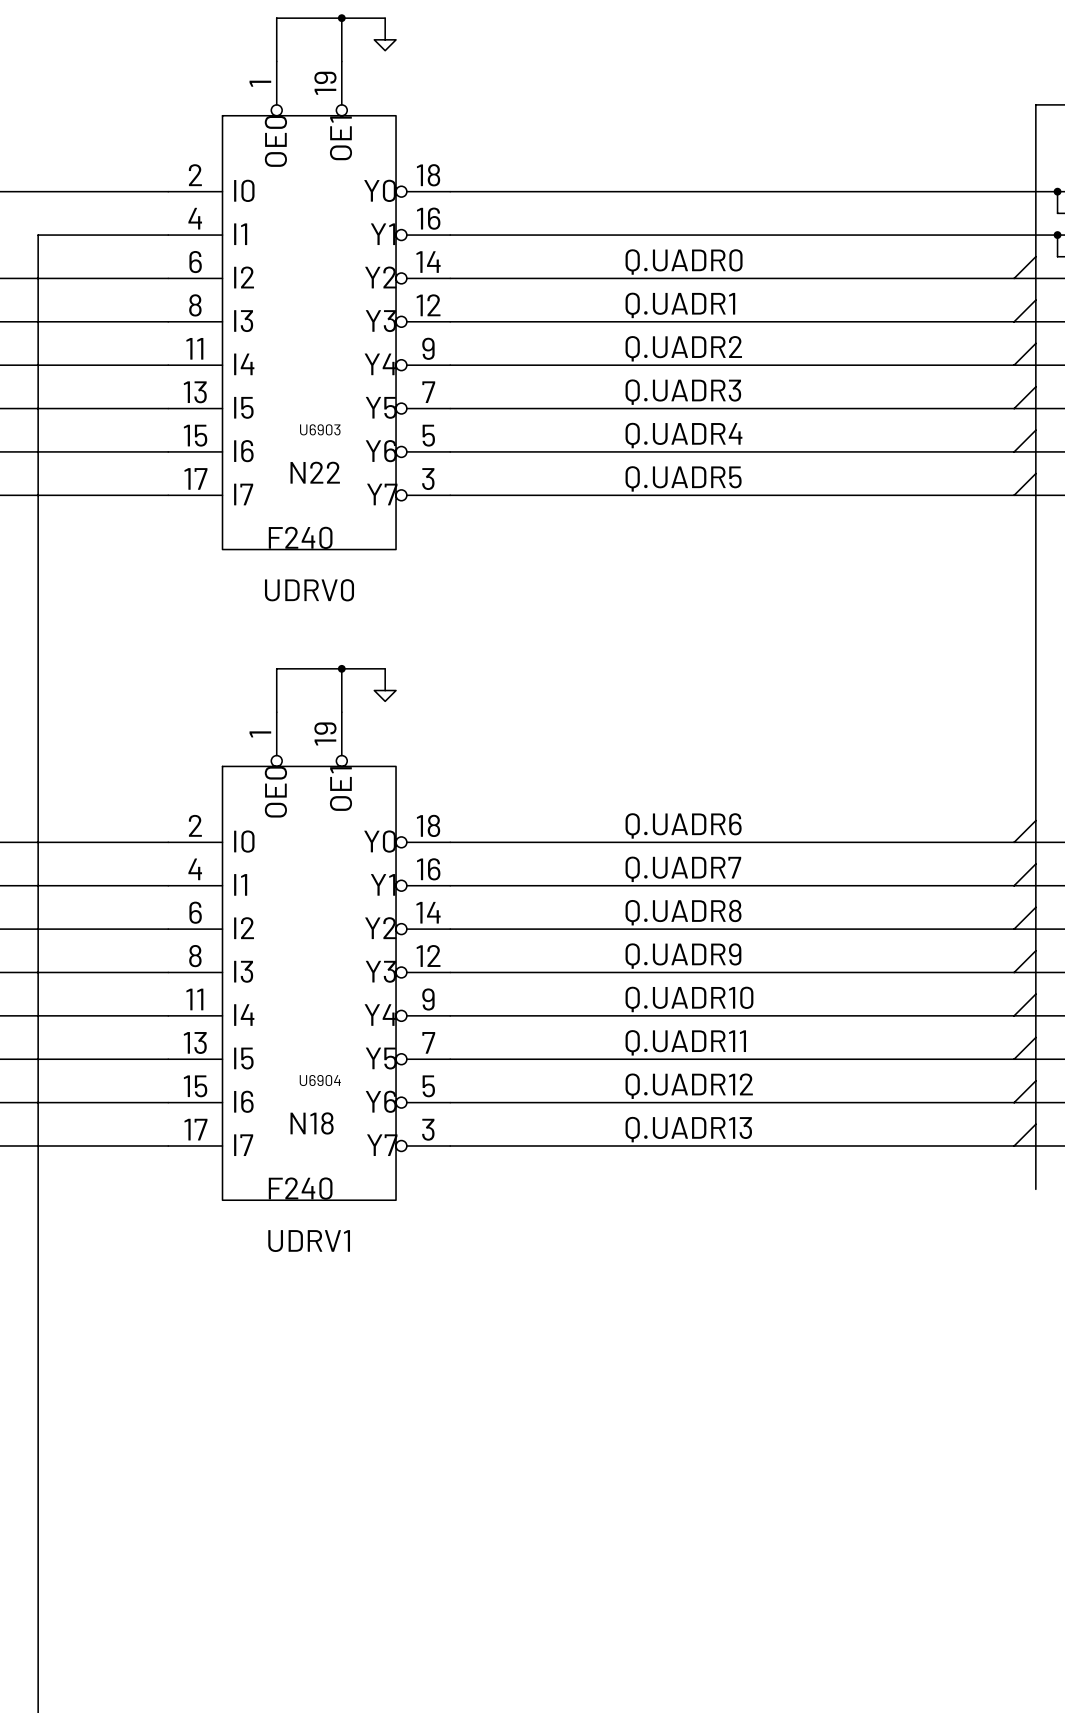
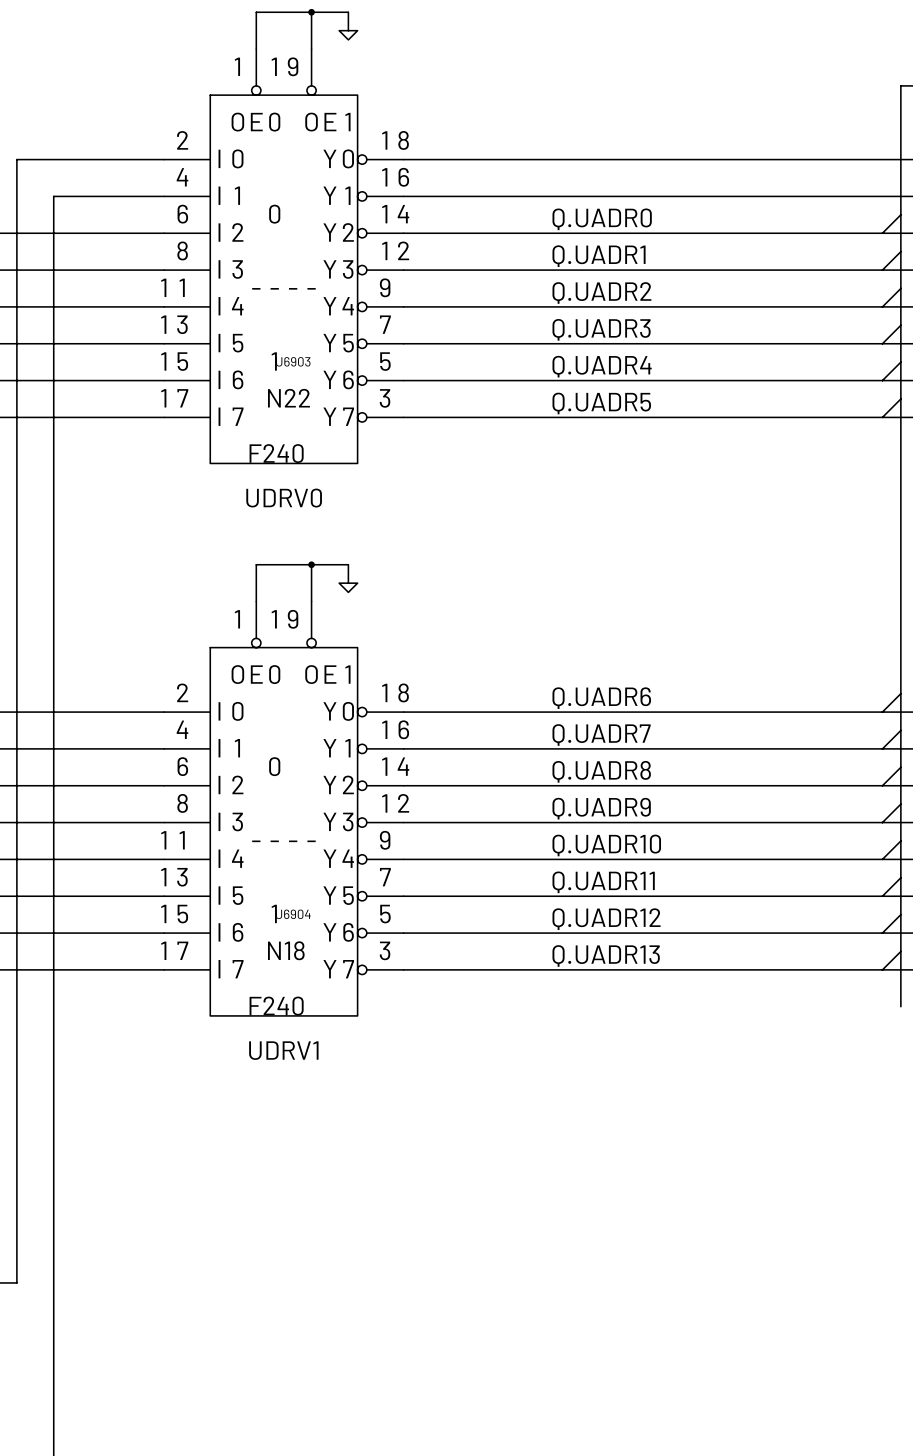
U6903 symbol: [168, 61, 451, 550] -> [164, 49, 404, 464]
U6904 symbol: [168, 712, 451, 1201] -> [164, 601, 404, 1016]

